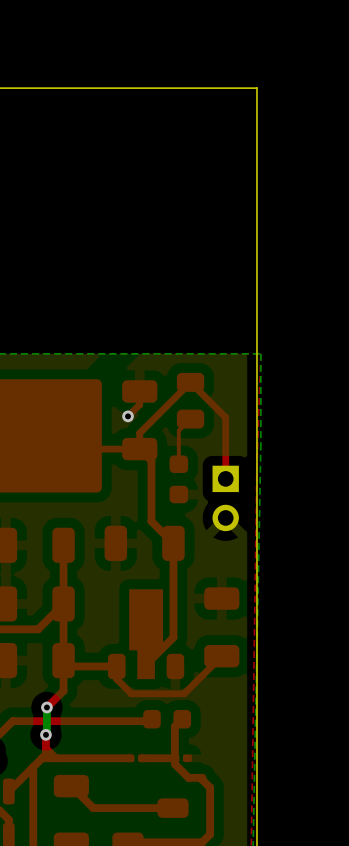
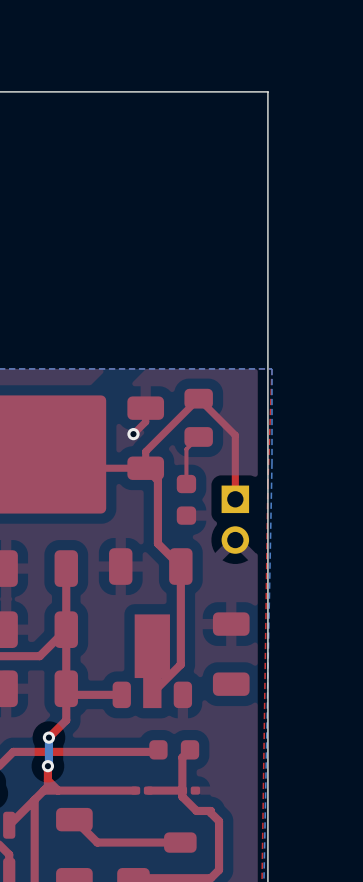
top track: (221, 656) (184, 693) (131, 693) (116, 679) (116, 666) -> none

